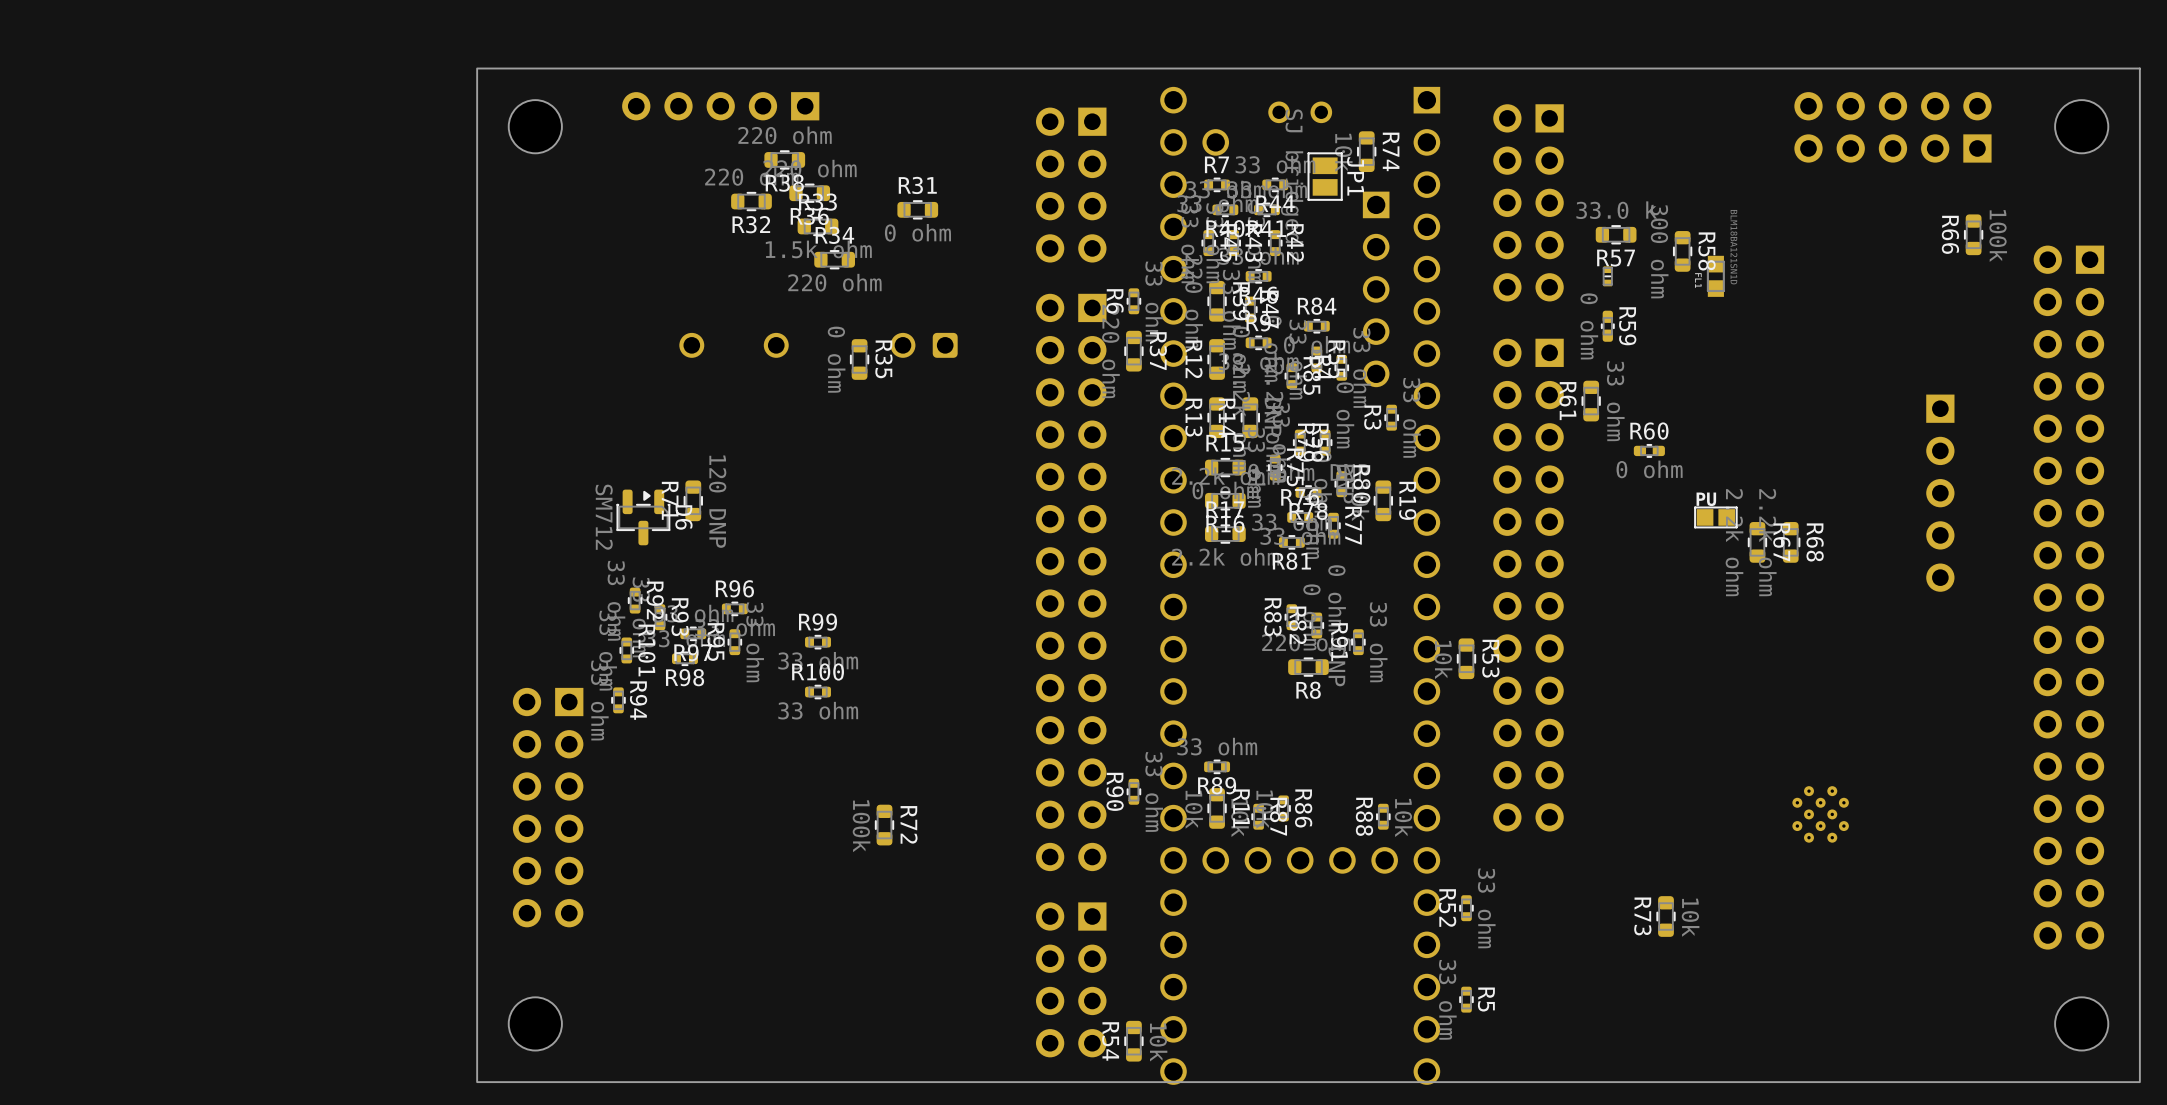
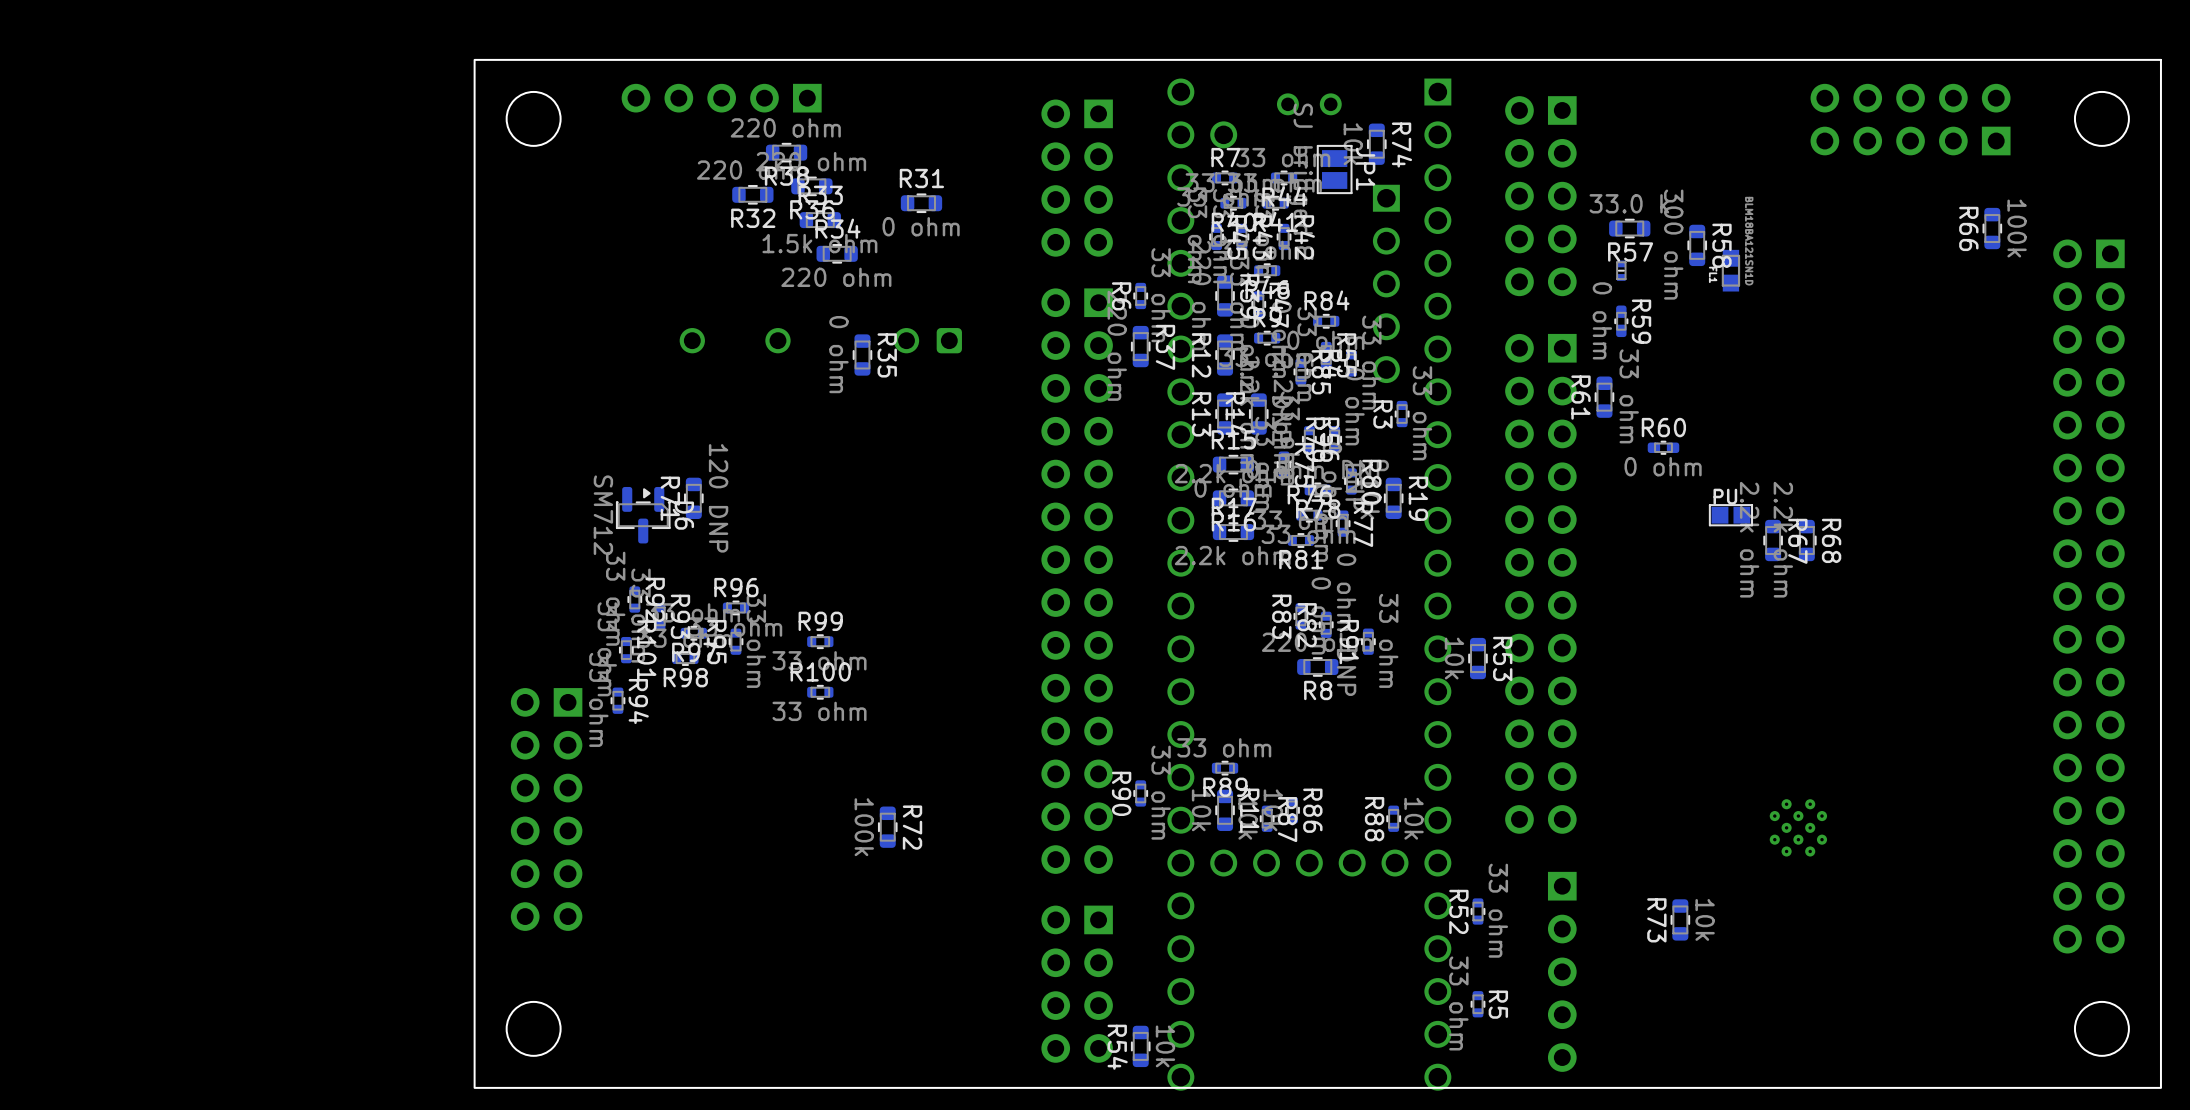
part: (1940, 493) -> none
part position: (1820, 814) -> (1798, 827)
part: none -> (1562, 971)

